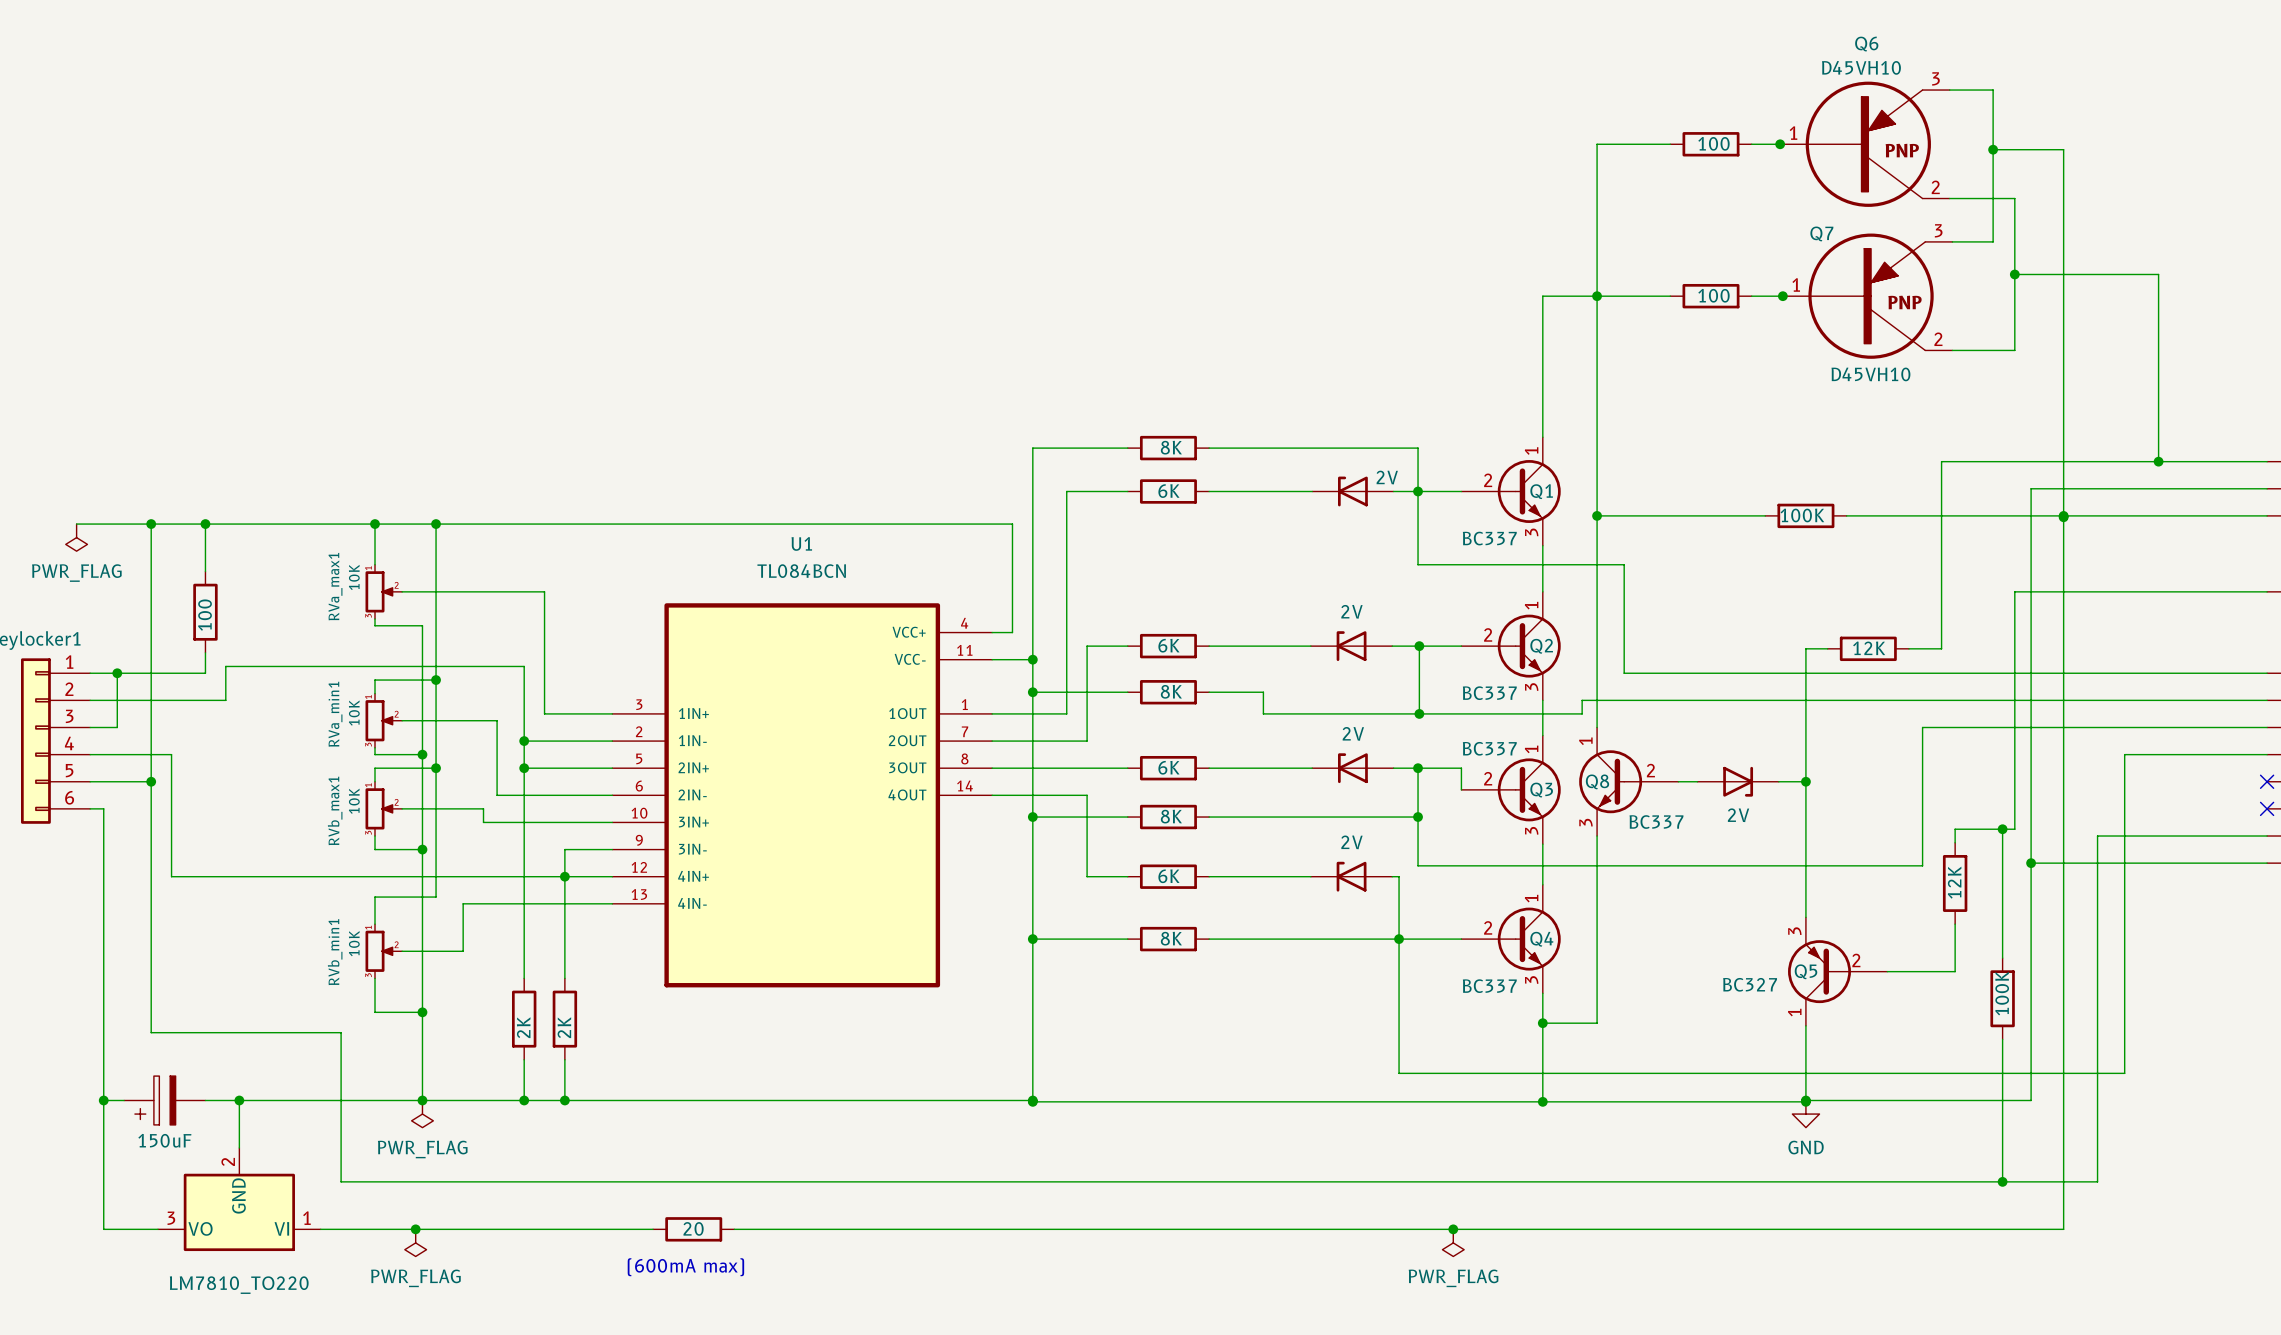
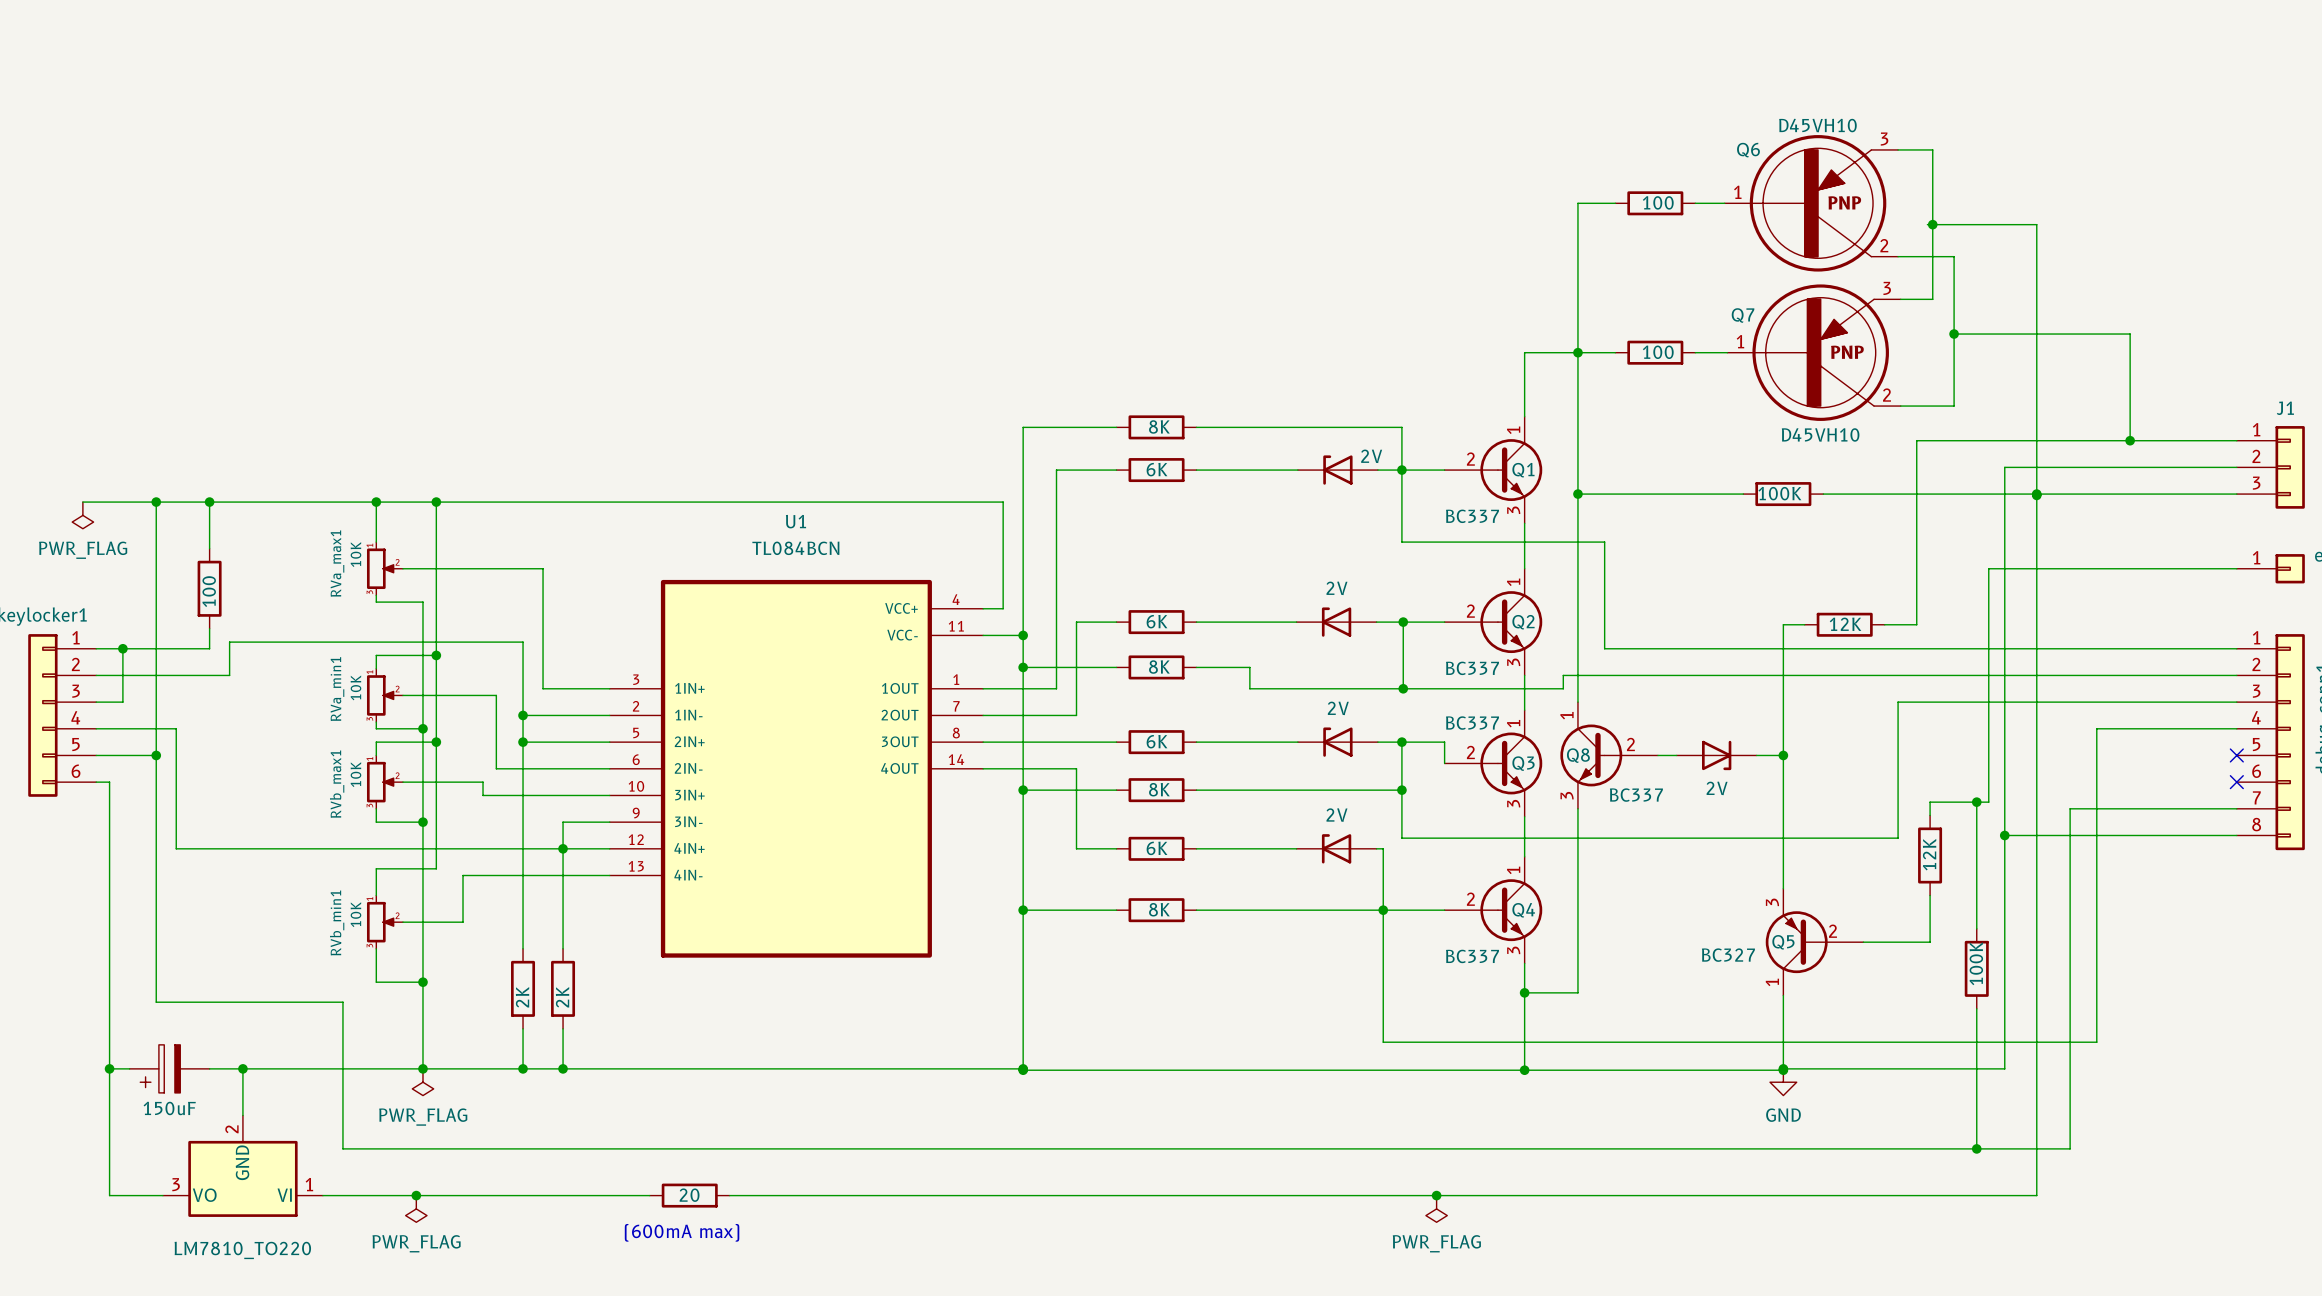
Q6 name position: Q6 (1866, 44) -> Q6 (1748, 150)
Q6 symbol: [1780, 81, 1950, 207] -> [1724, 135, 1899, 272]
wire: (1949, 90) (1993, 90) (1993, 241) -> none
wire: (1670, 144) (1597, 144) (1597, 220) -> (1615, 203) (1577, 203)
part: 100 (1710, 144) -> none
wire: (1751, 144) (1781, 144) -> (1695, 203) (1724, 203)
junction: (1780, 144) -> none
wire: (1993, 149) (2063, 149) (2063, 241) -> (1967, 224) (2036, 224)
junction: (1993, 149) -> none
wire: none -> (1898, 149) (1932, 149) (1932, 299) (1900, 299)
wire: (1949, 198) (2014, 198) (2014, 350) (1952, 350) -> none
part: none -> 100 (1655, 203)
Q7 symbol: [1782, 233, 1953, 359] -> [1727, 284, 1901, 421]
Q7 name position: Q7 (1821, 233) -> Q7 (1743, 315)
junction: none -> (1932, 224)
wire: none -> (1898, 256) (1954, 256) (1954, 406) (1900, 406)
wire: (2014, 274) (2158, 274) (2158, 353) -> (1954, 334) (2130, 334)
junction: (2014, 274) -> none
junction: (1597, 296) -> none
wire: (1670, 296) (1542, 296) (1542, 372) -> (1615, 352) (1524, 352)
part: 100 (1710, 296) -> none
wire: (1751, 296) (1784, 296) -> (1695, 352) (1727, 352)
junction: (1782, 296) -> none
junction: none -> (1954, 334)
junction: none -> (1577, 352)
part: none -> 100 (1655, 352)

